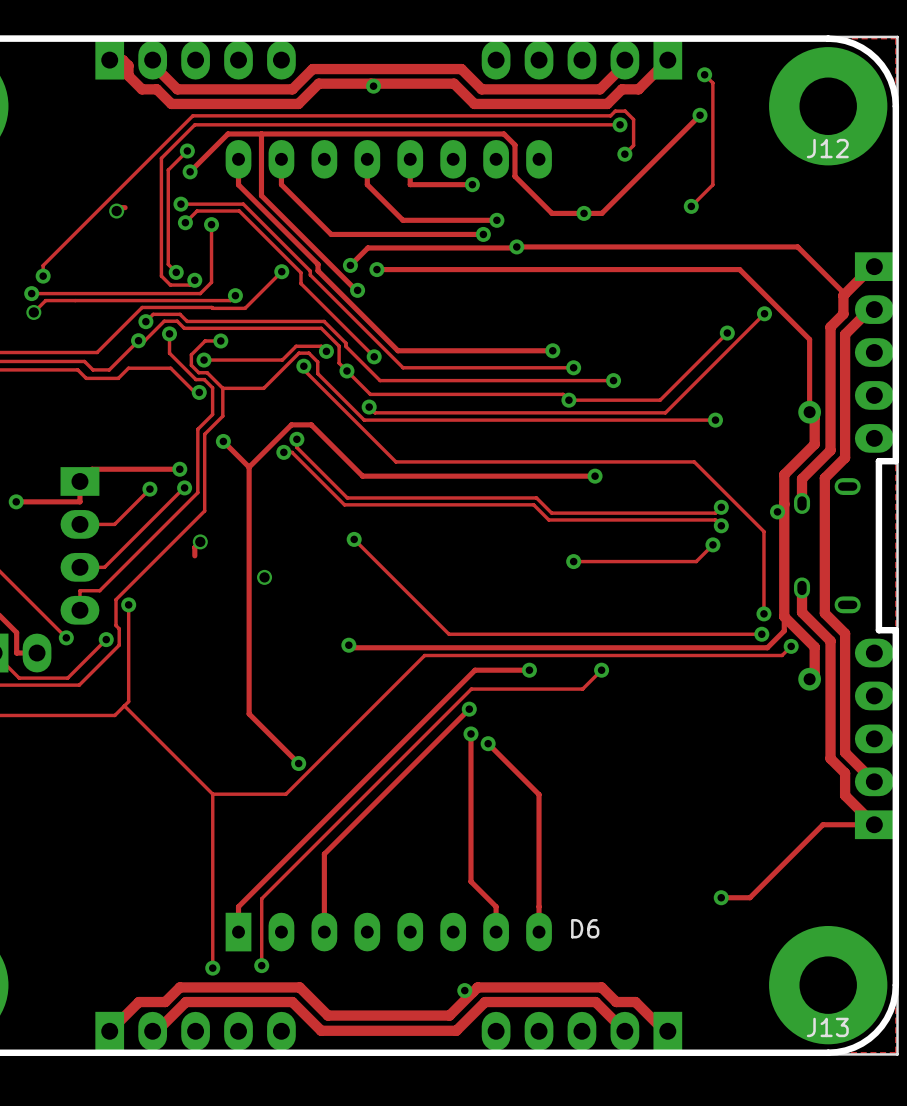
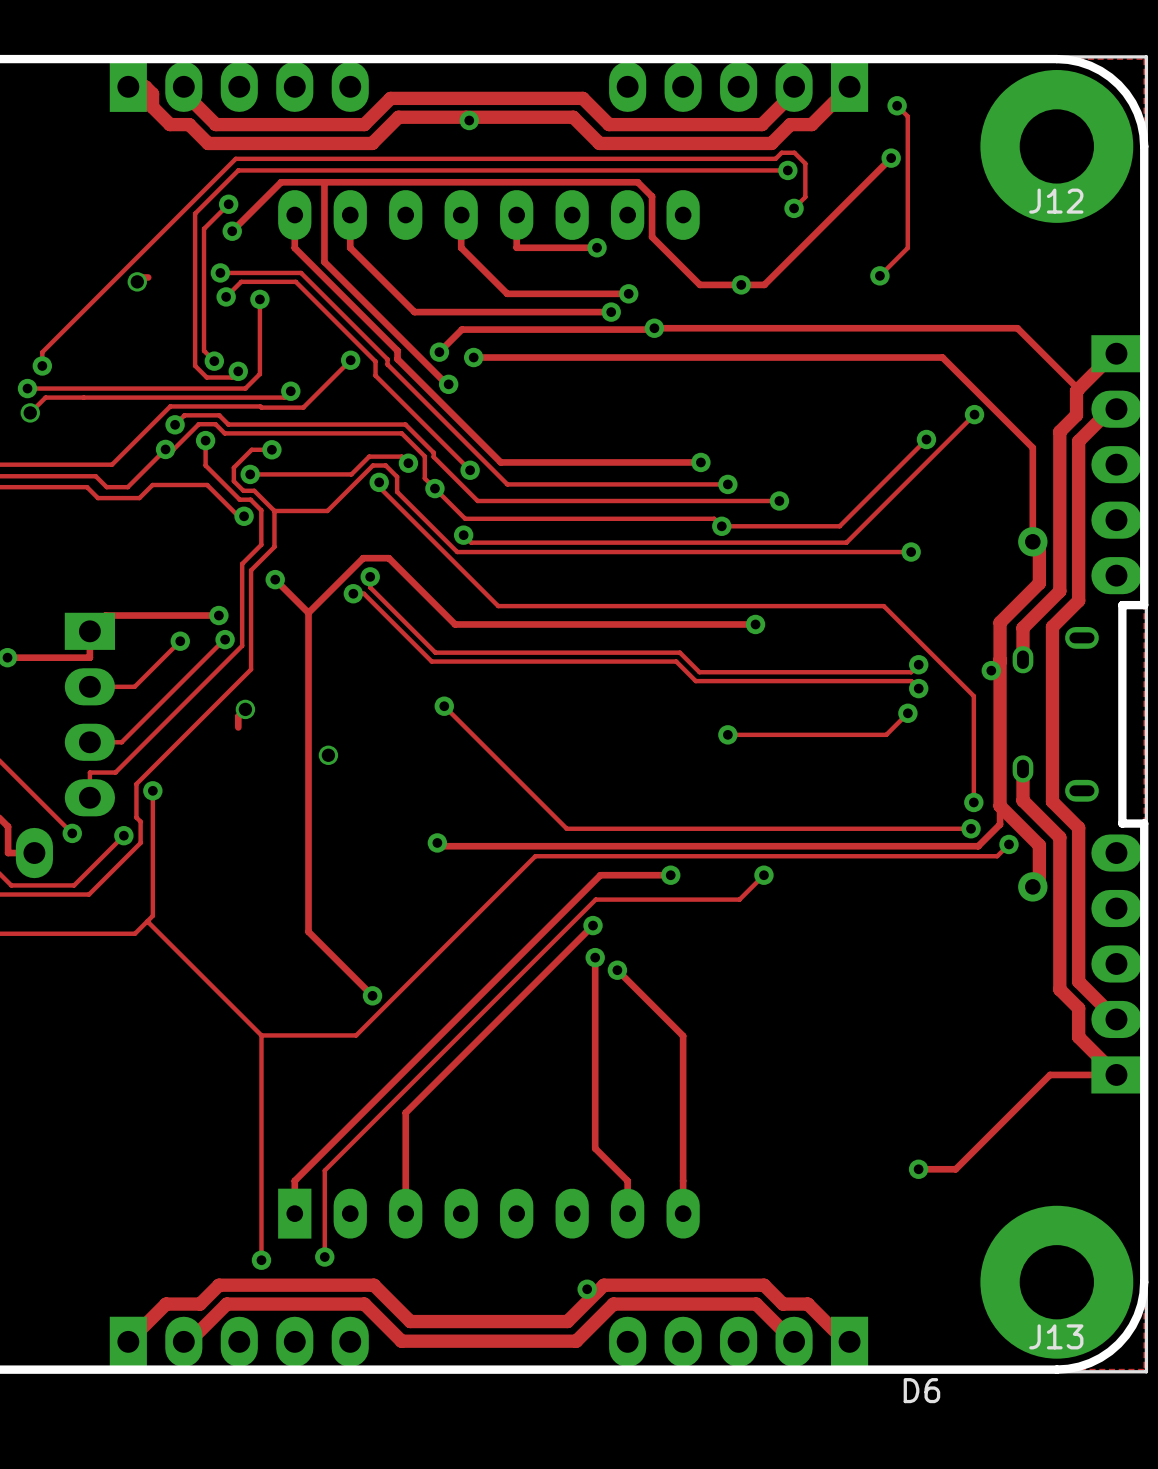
D6 name position: D6 (585, 928) -> D6 (921, 1390)

